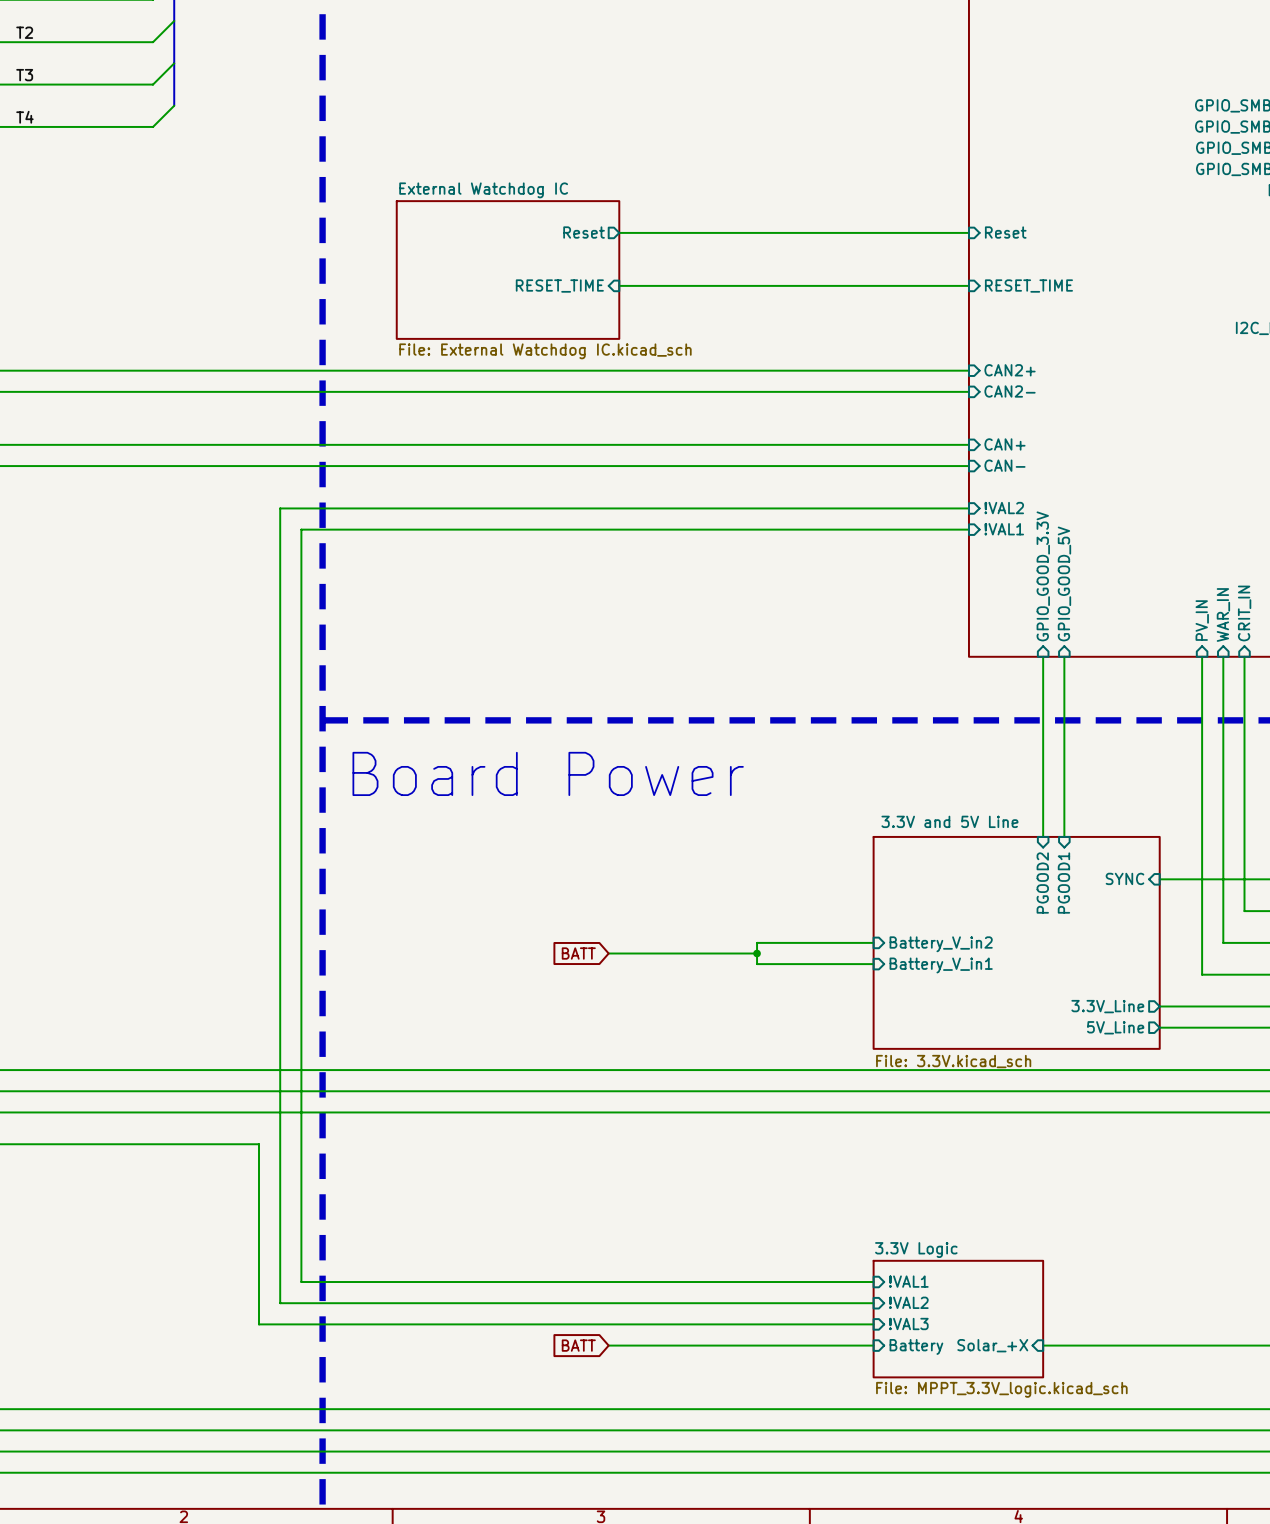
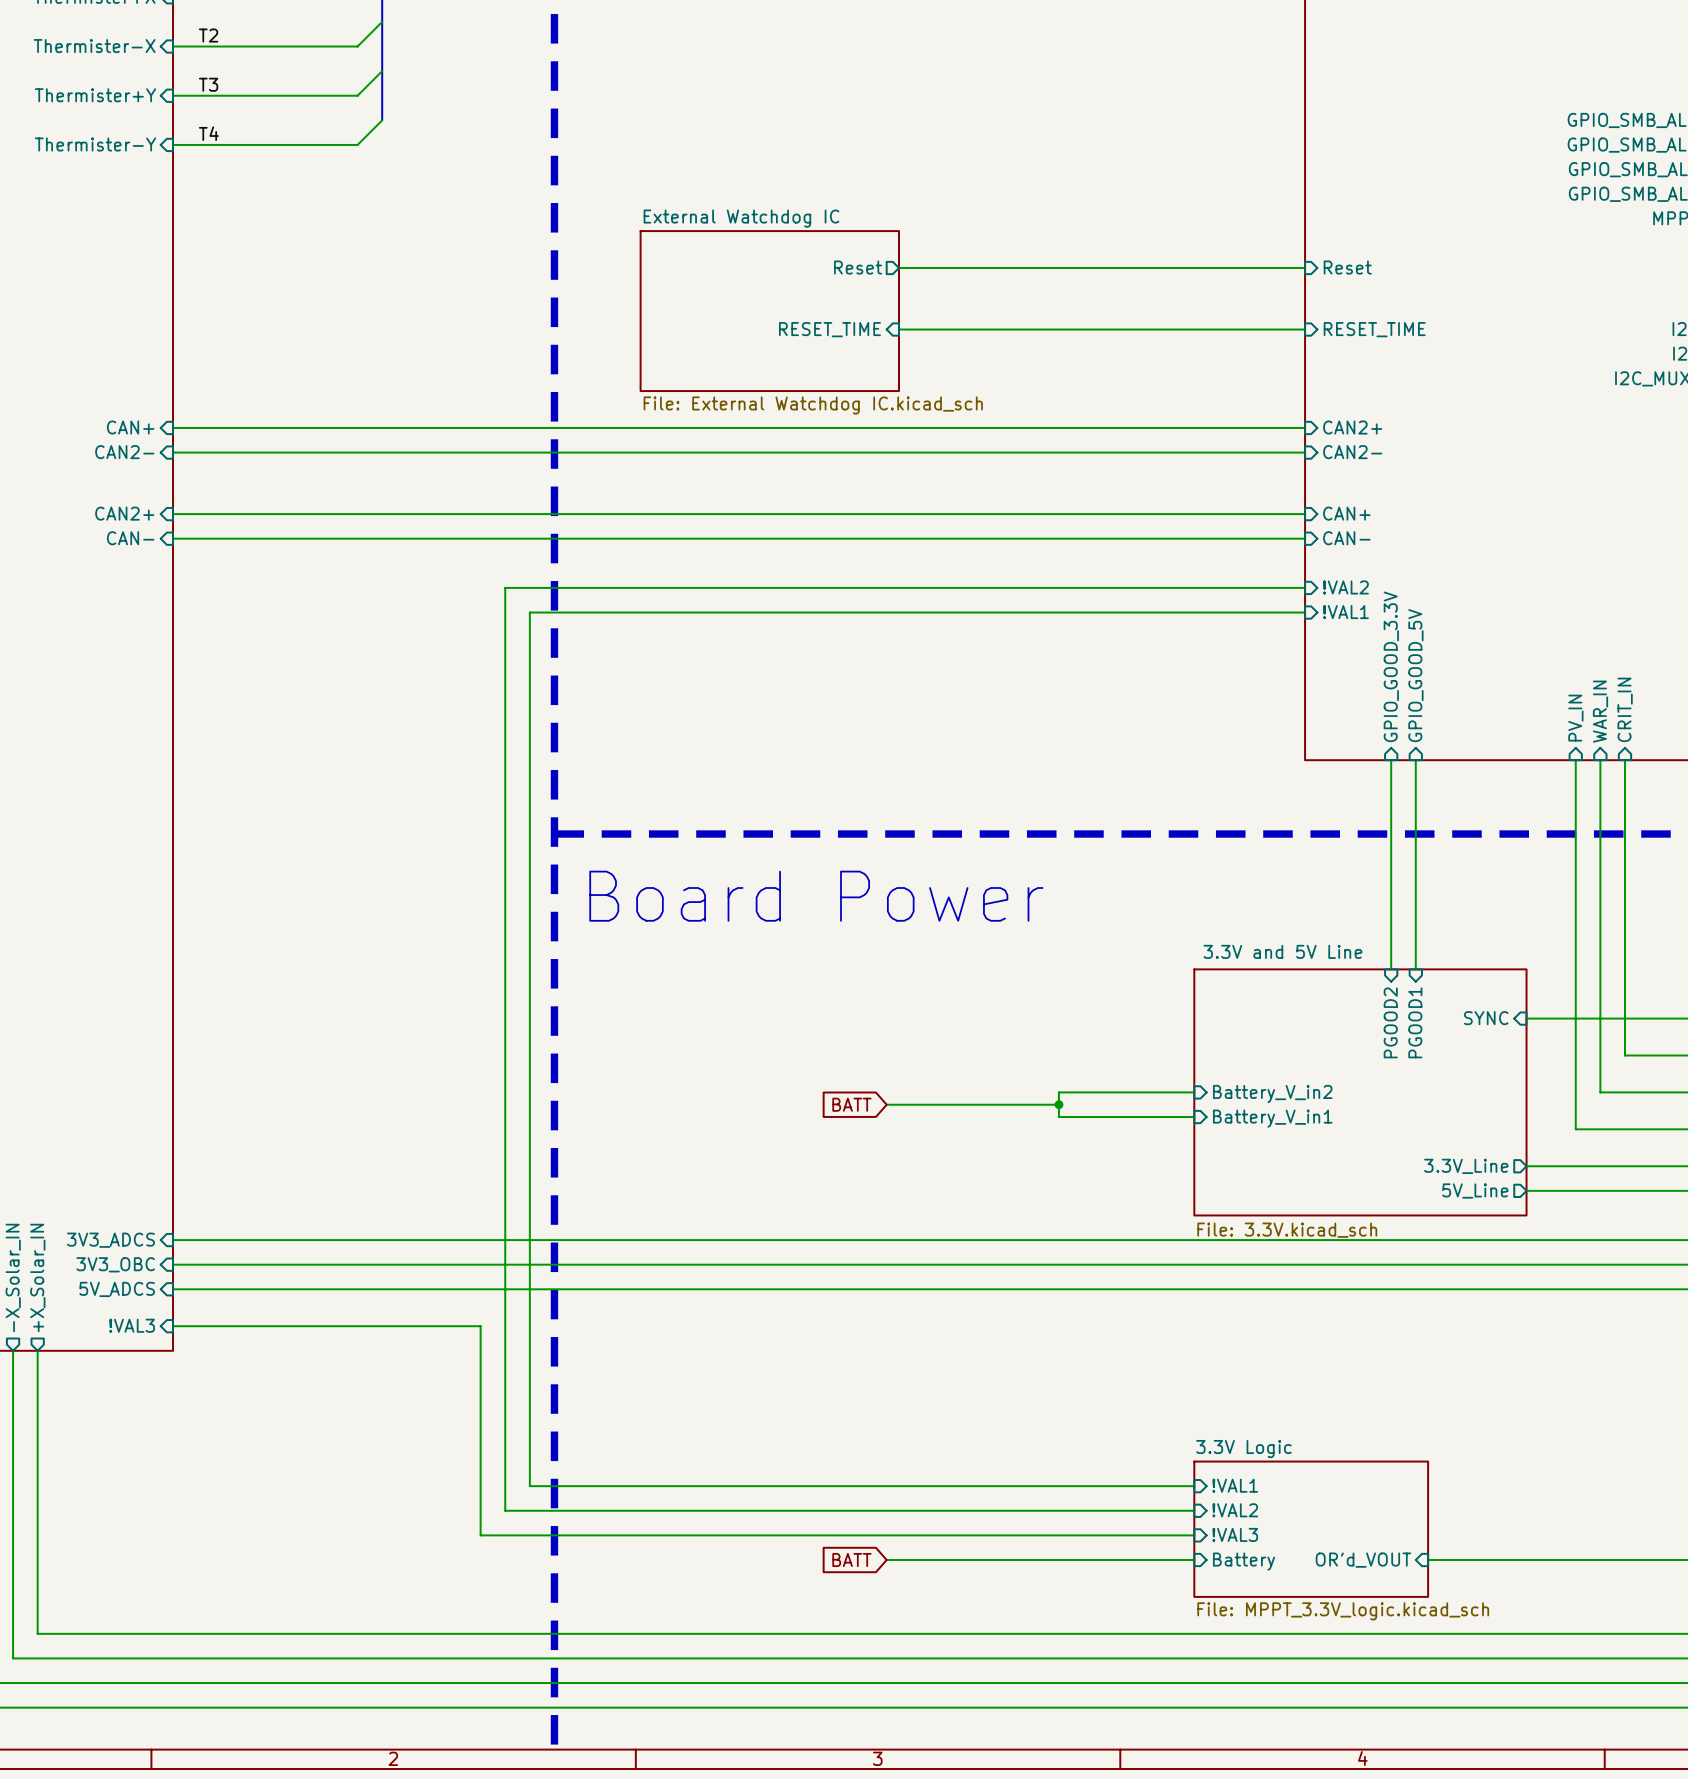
sheet 3.3V Logic shape: [872, 1260, 1044, 1379] -> [1193, 1460, 1429, 1598]
sheet pin: Solar_+X (992, 1345) -> none
sheet pin: none -> OR'd_VOUT (1363, 1560)
wire: (1043, 1345) (1074, 1345) -> none

